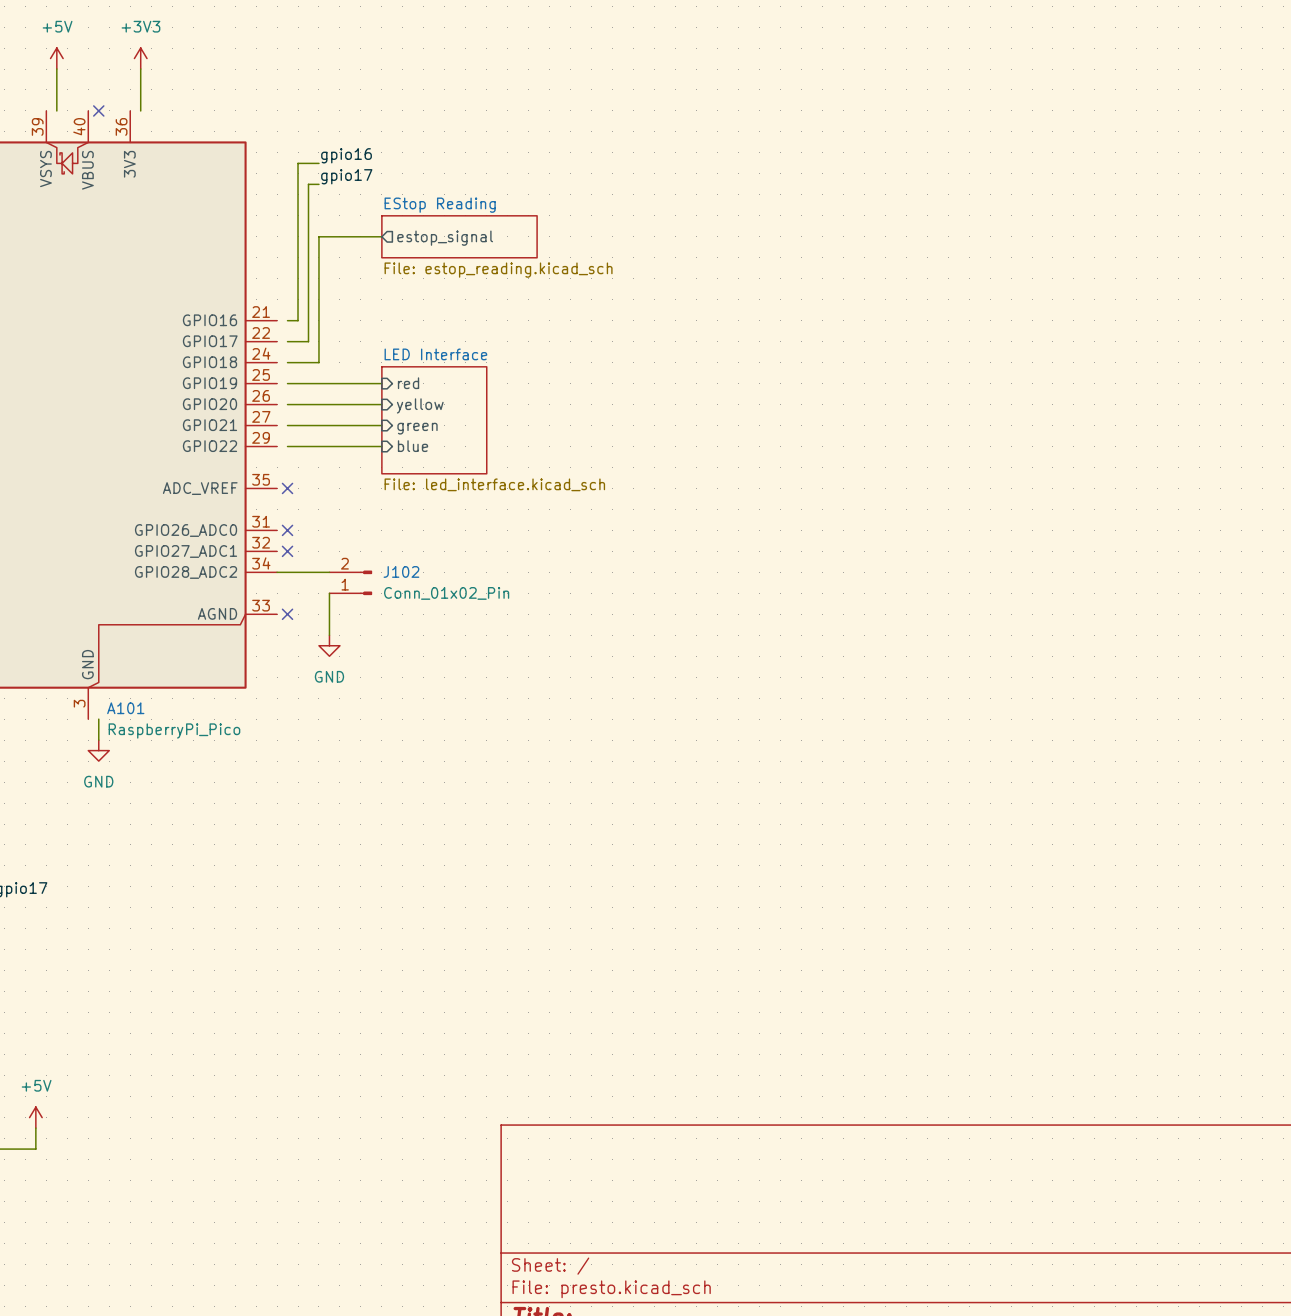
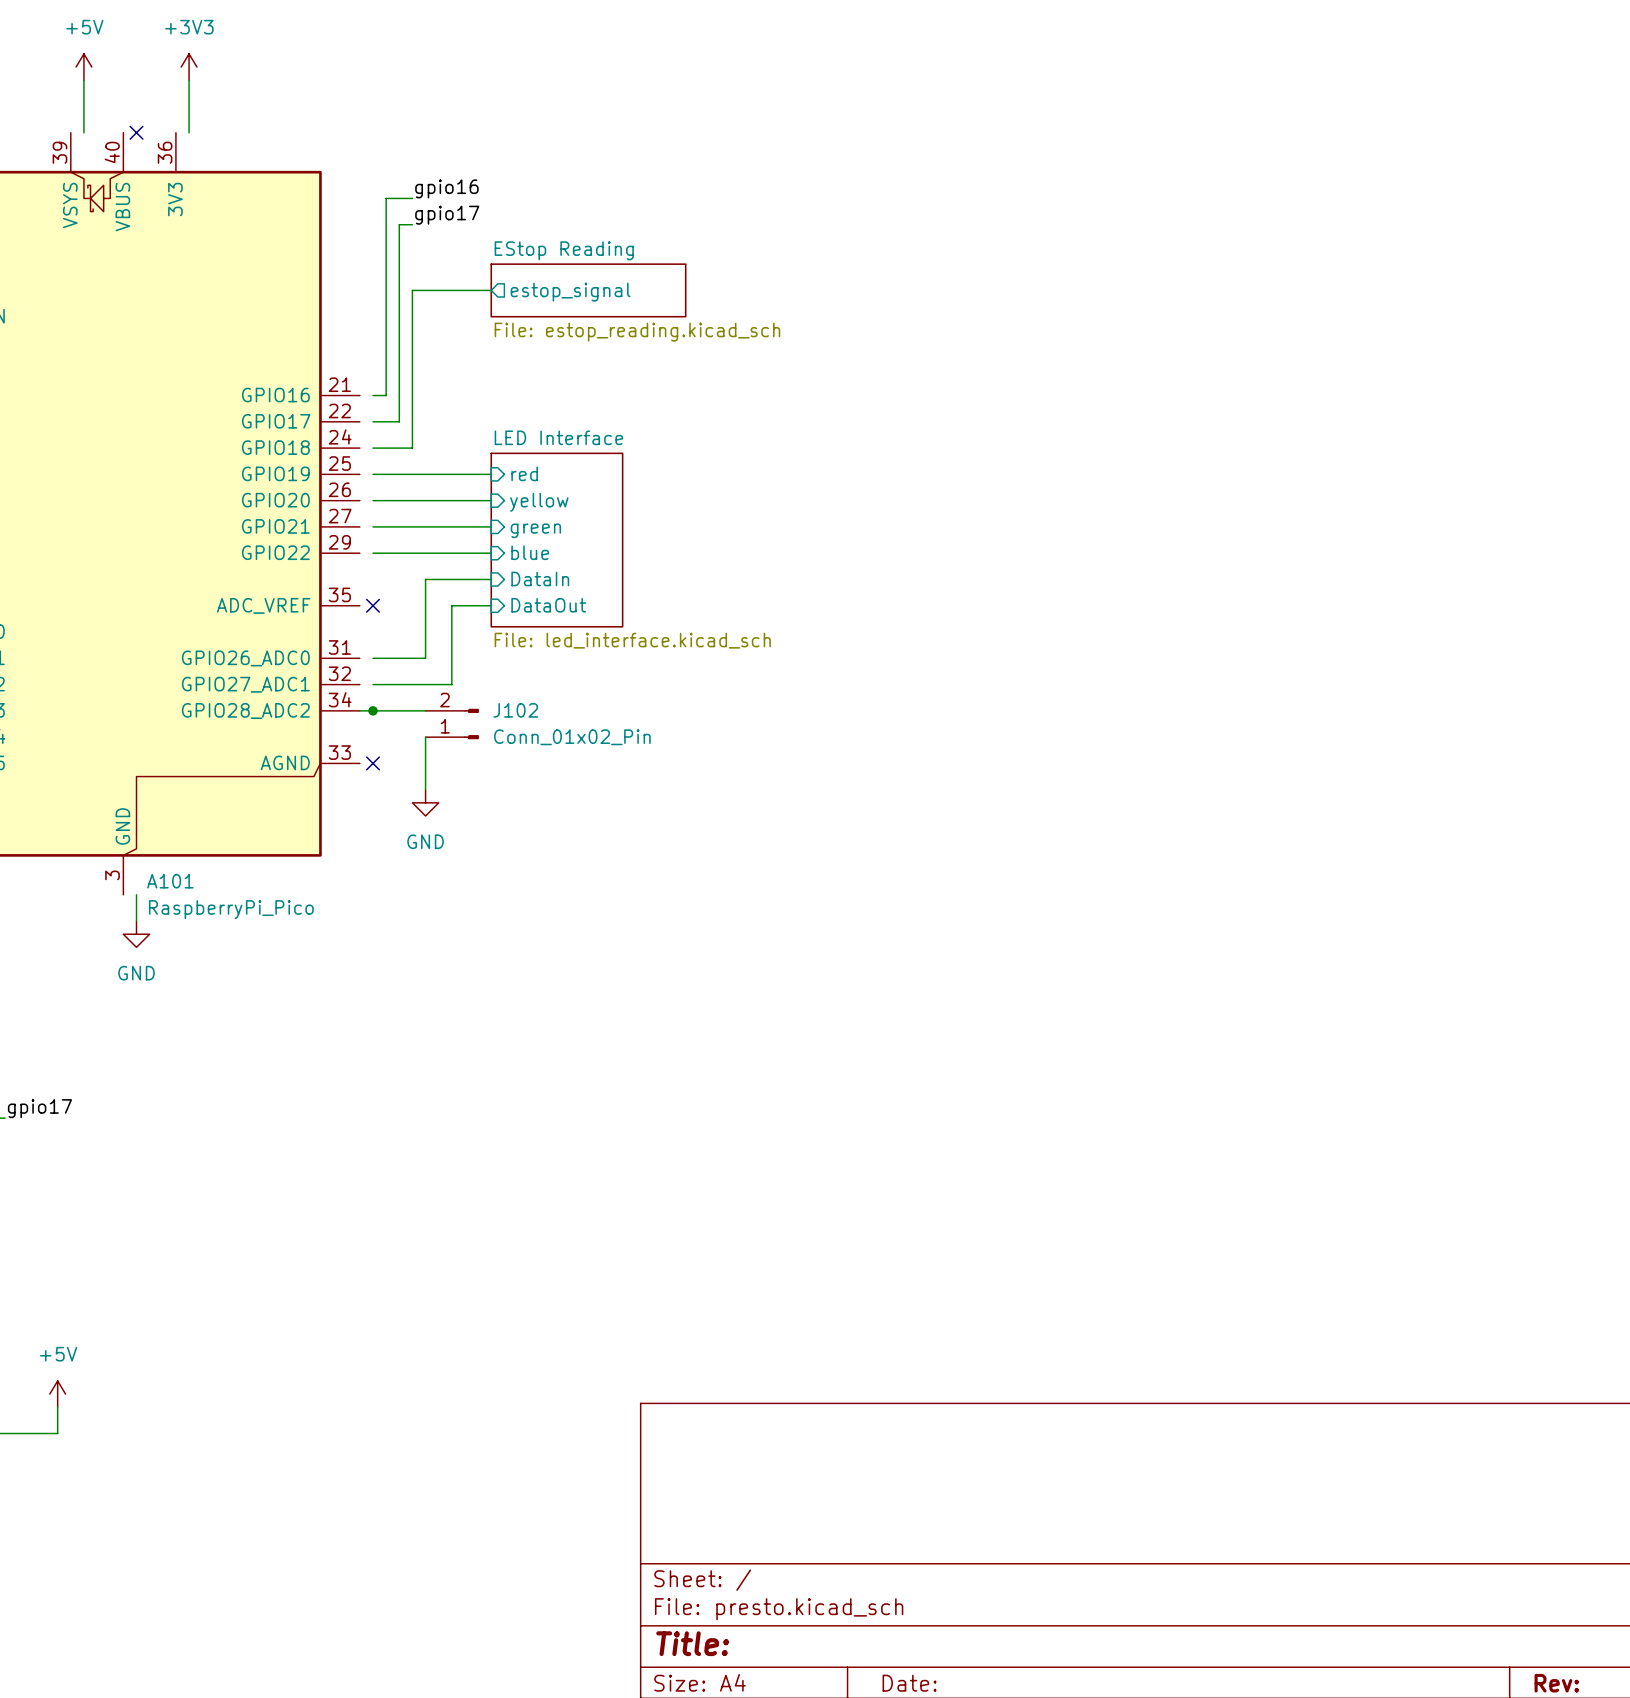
sheet LED Interface: File: led_interface.kicad_sch (434, 420) -> none
sheet LED Interface: none -> File: led_interface.kicad_sch (556, 540)
wire: none -> (491, 579) (425, 579) (425, 658) (373, 658)
sheet pin: none -> DataIn (540, 578)
wire: none -> (491, 605) (451, 605) (451, 684) (373, 684)
sheet pin: none -> DataOut (548, 605)
no-connect mark: (287, 530) -> none
no-connect mark: (287, 551) -> none
junction: none -> (373, 710)

